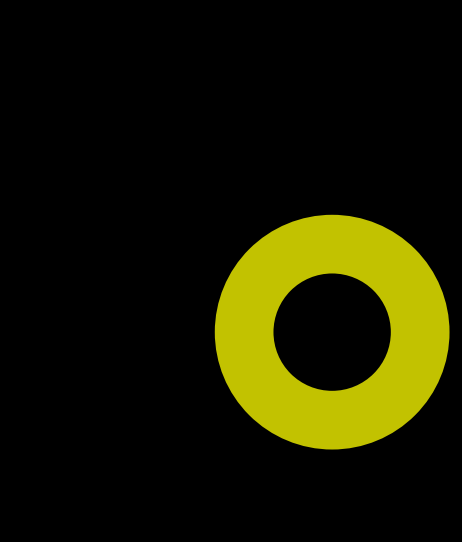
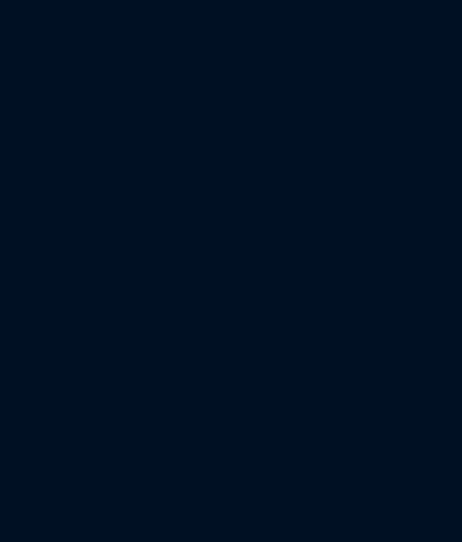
part: (332, 332) -> none

